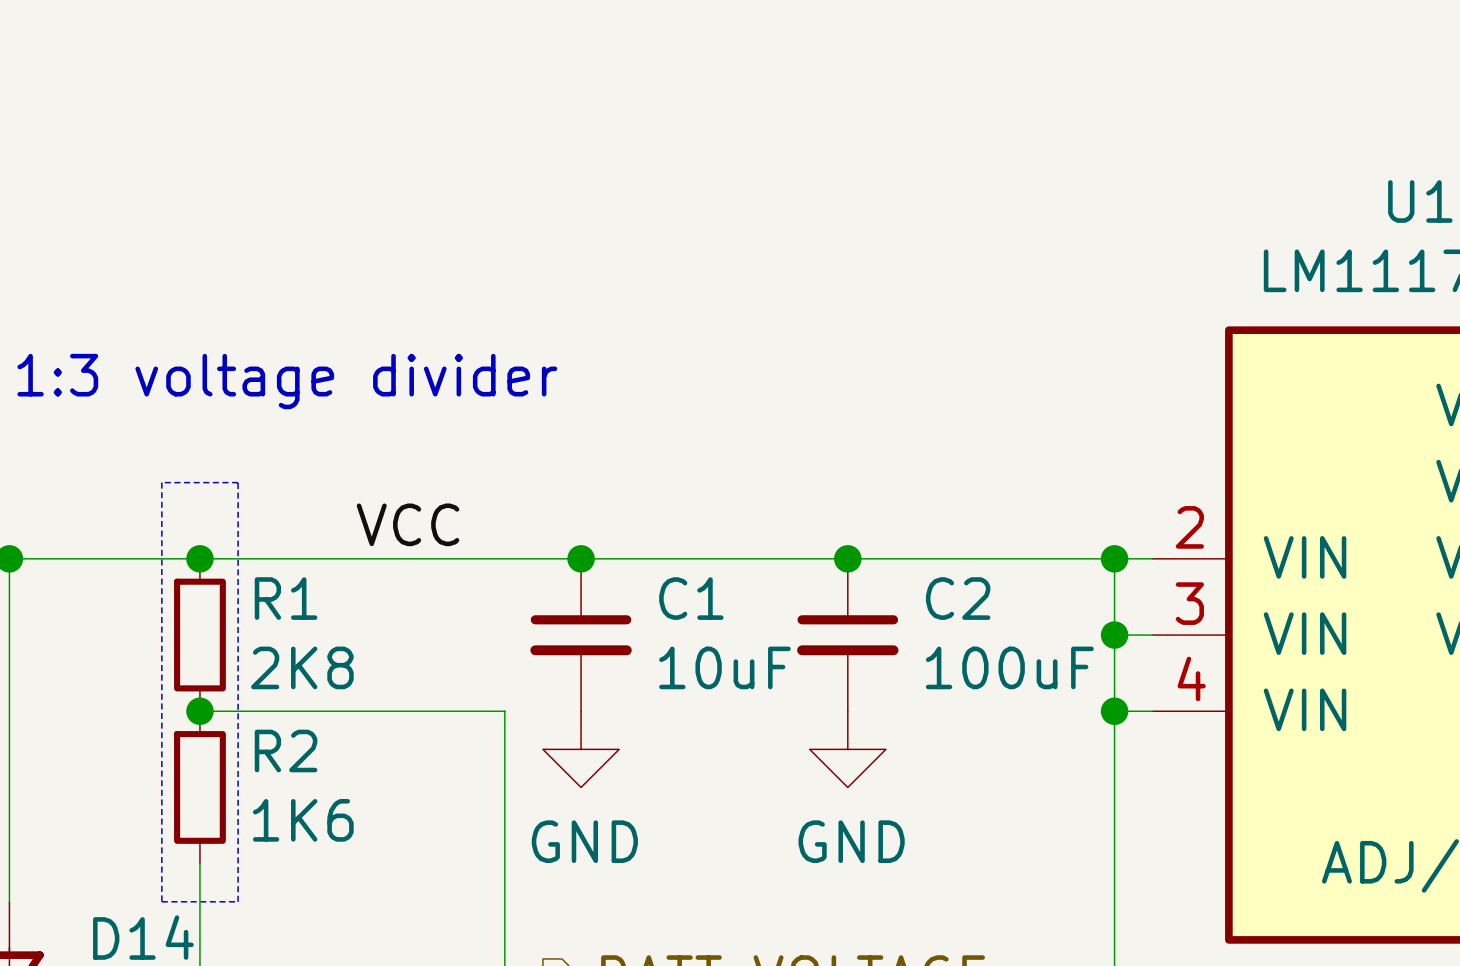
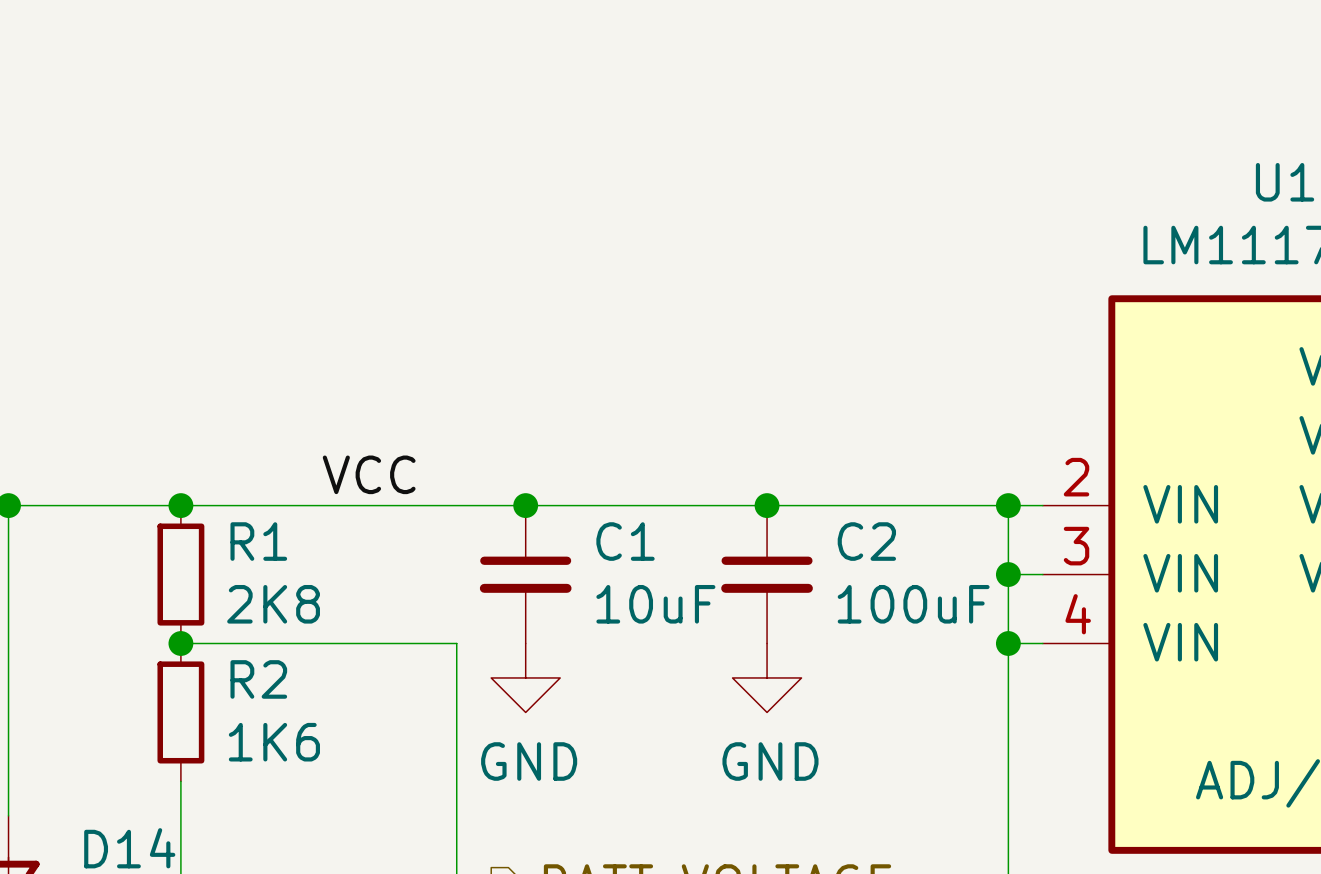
text: 1:3 voltage divider (287, 381) -> none
line: (161, 482) (161, 901) (238, 901) (238, 482) (161, 482) -> none

